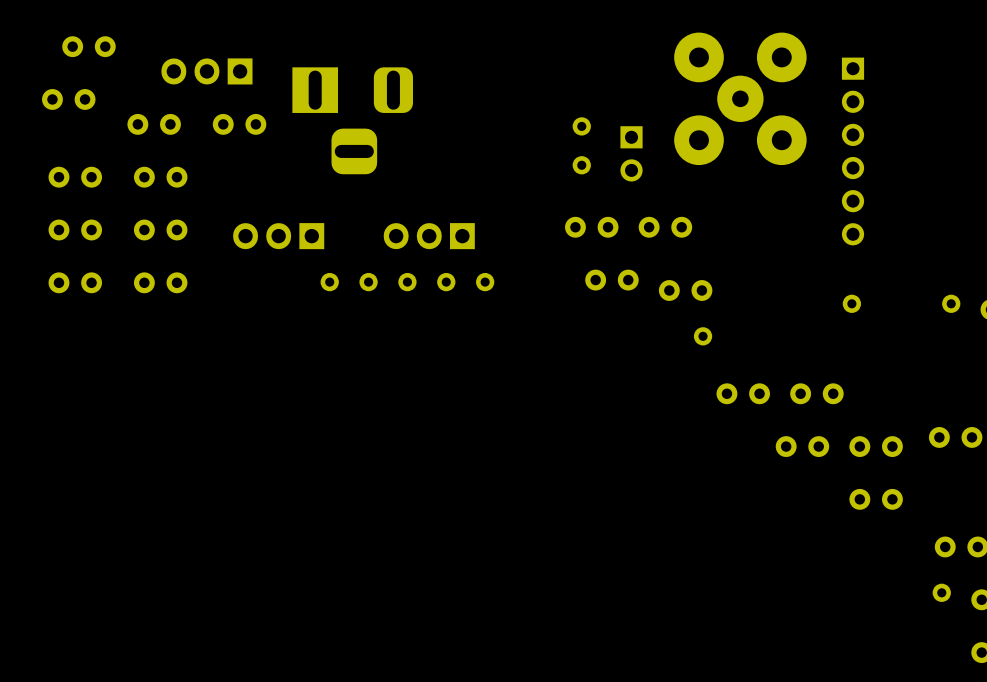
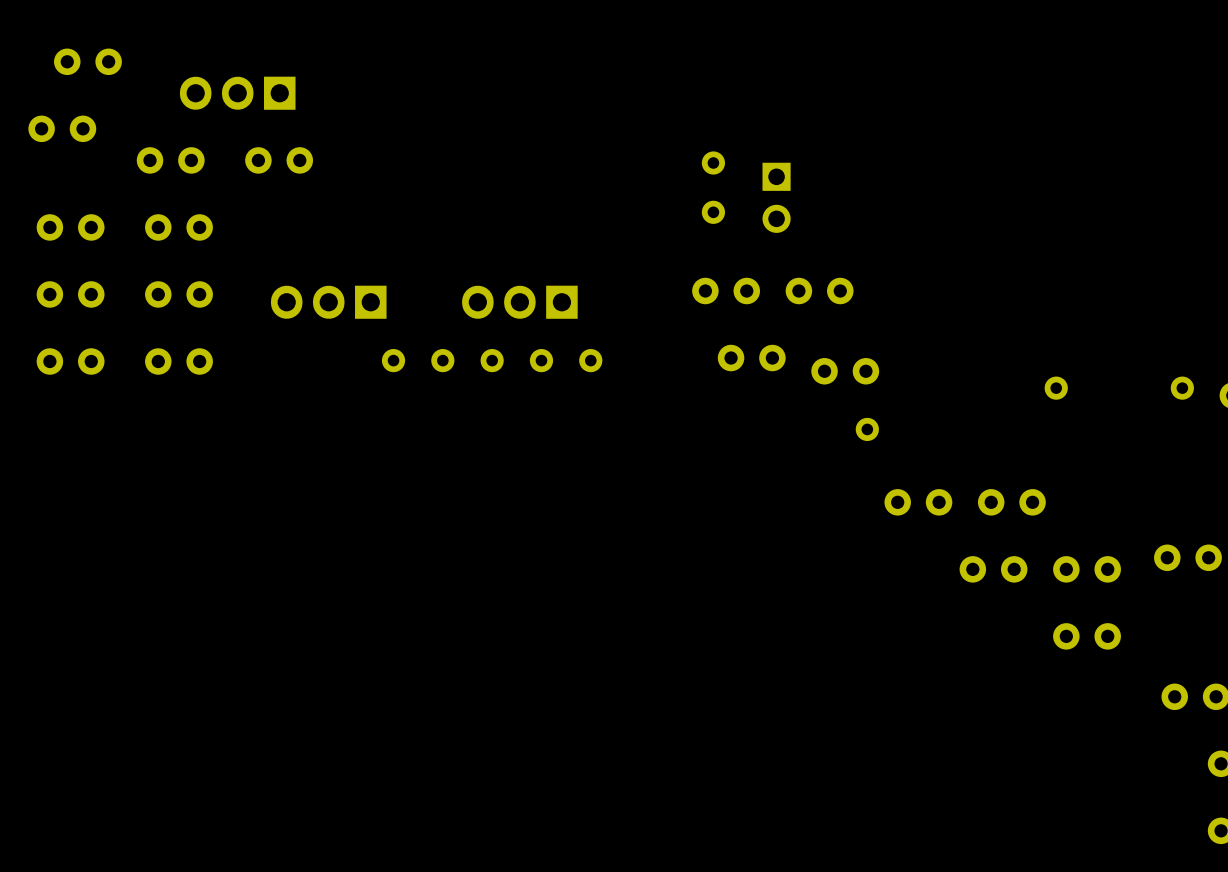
part: (740, 98) -> none
part: (352, 120) -> none
part: (853, 151) -> none
part: (941, 592) -> none

